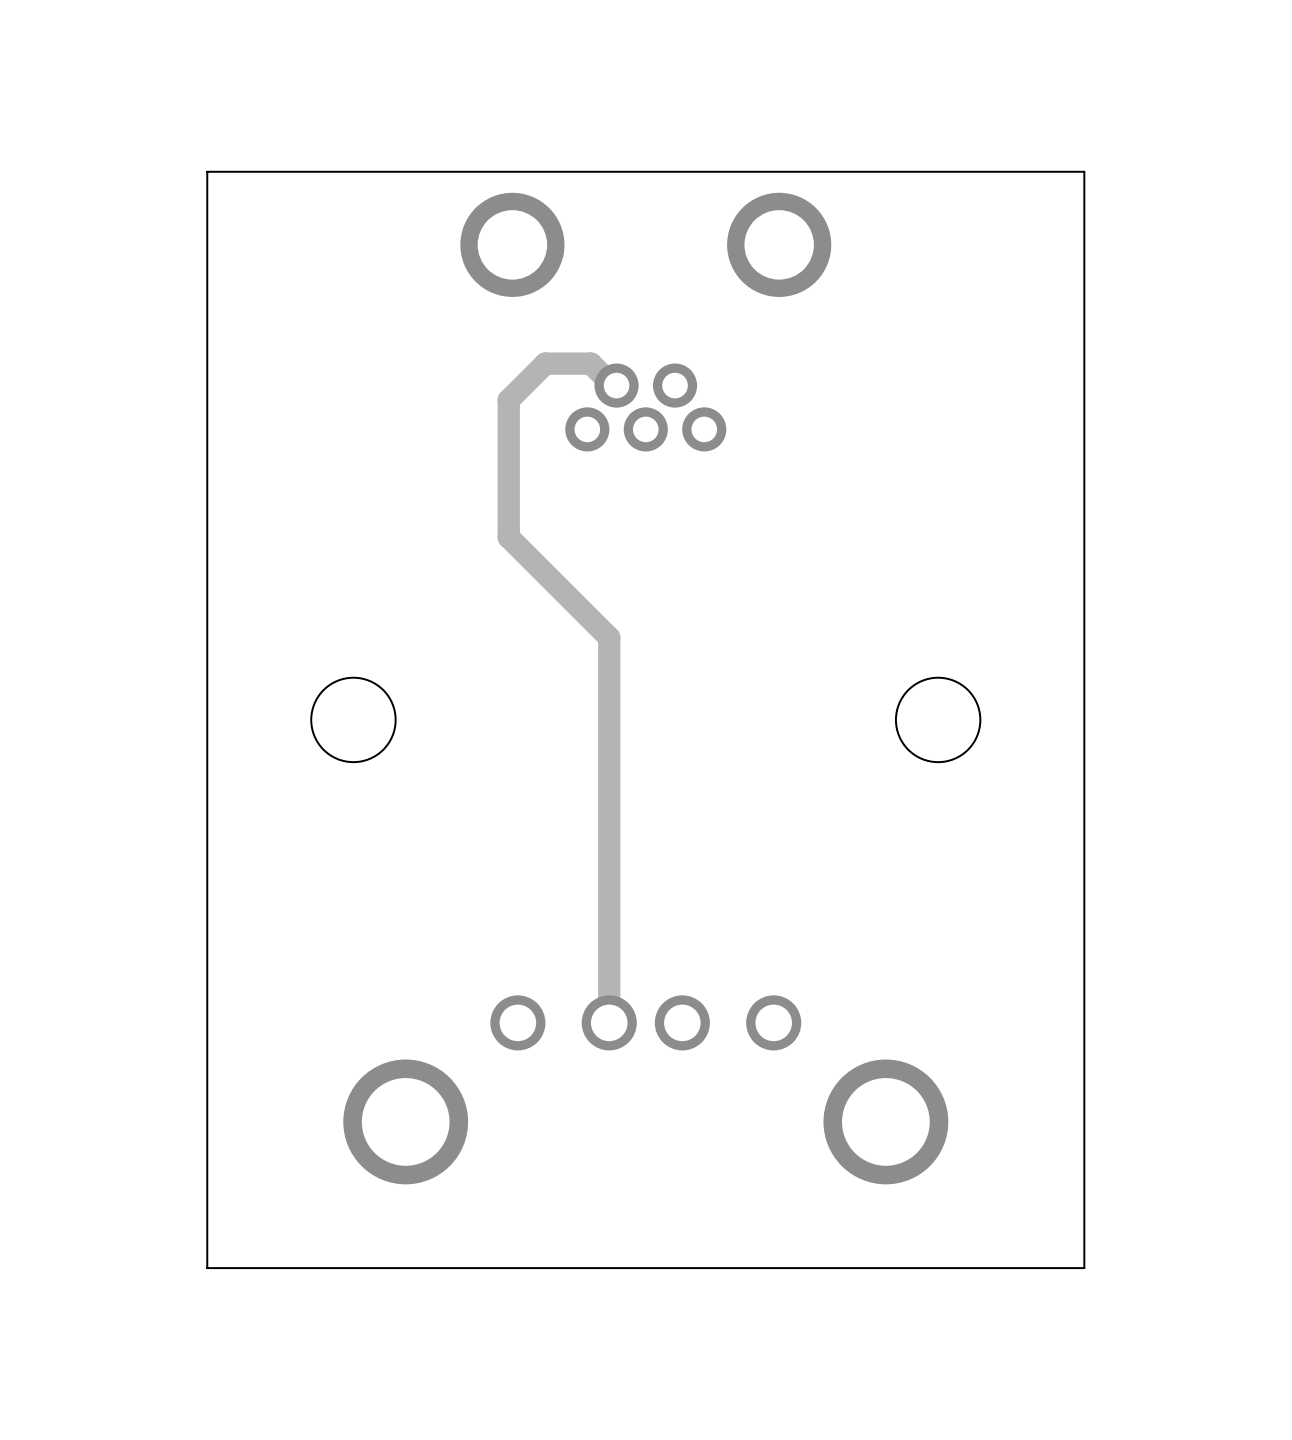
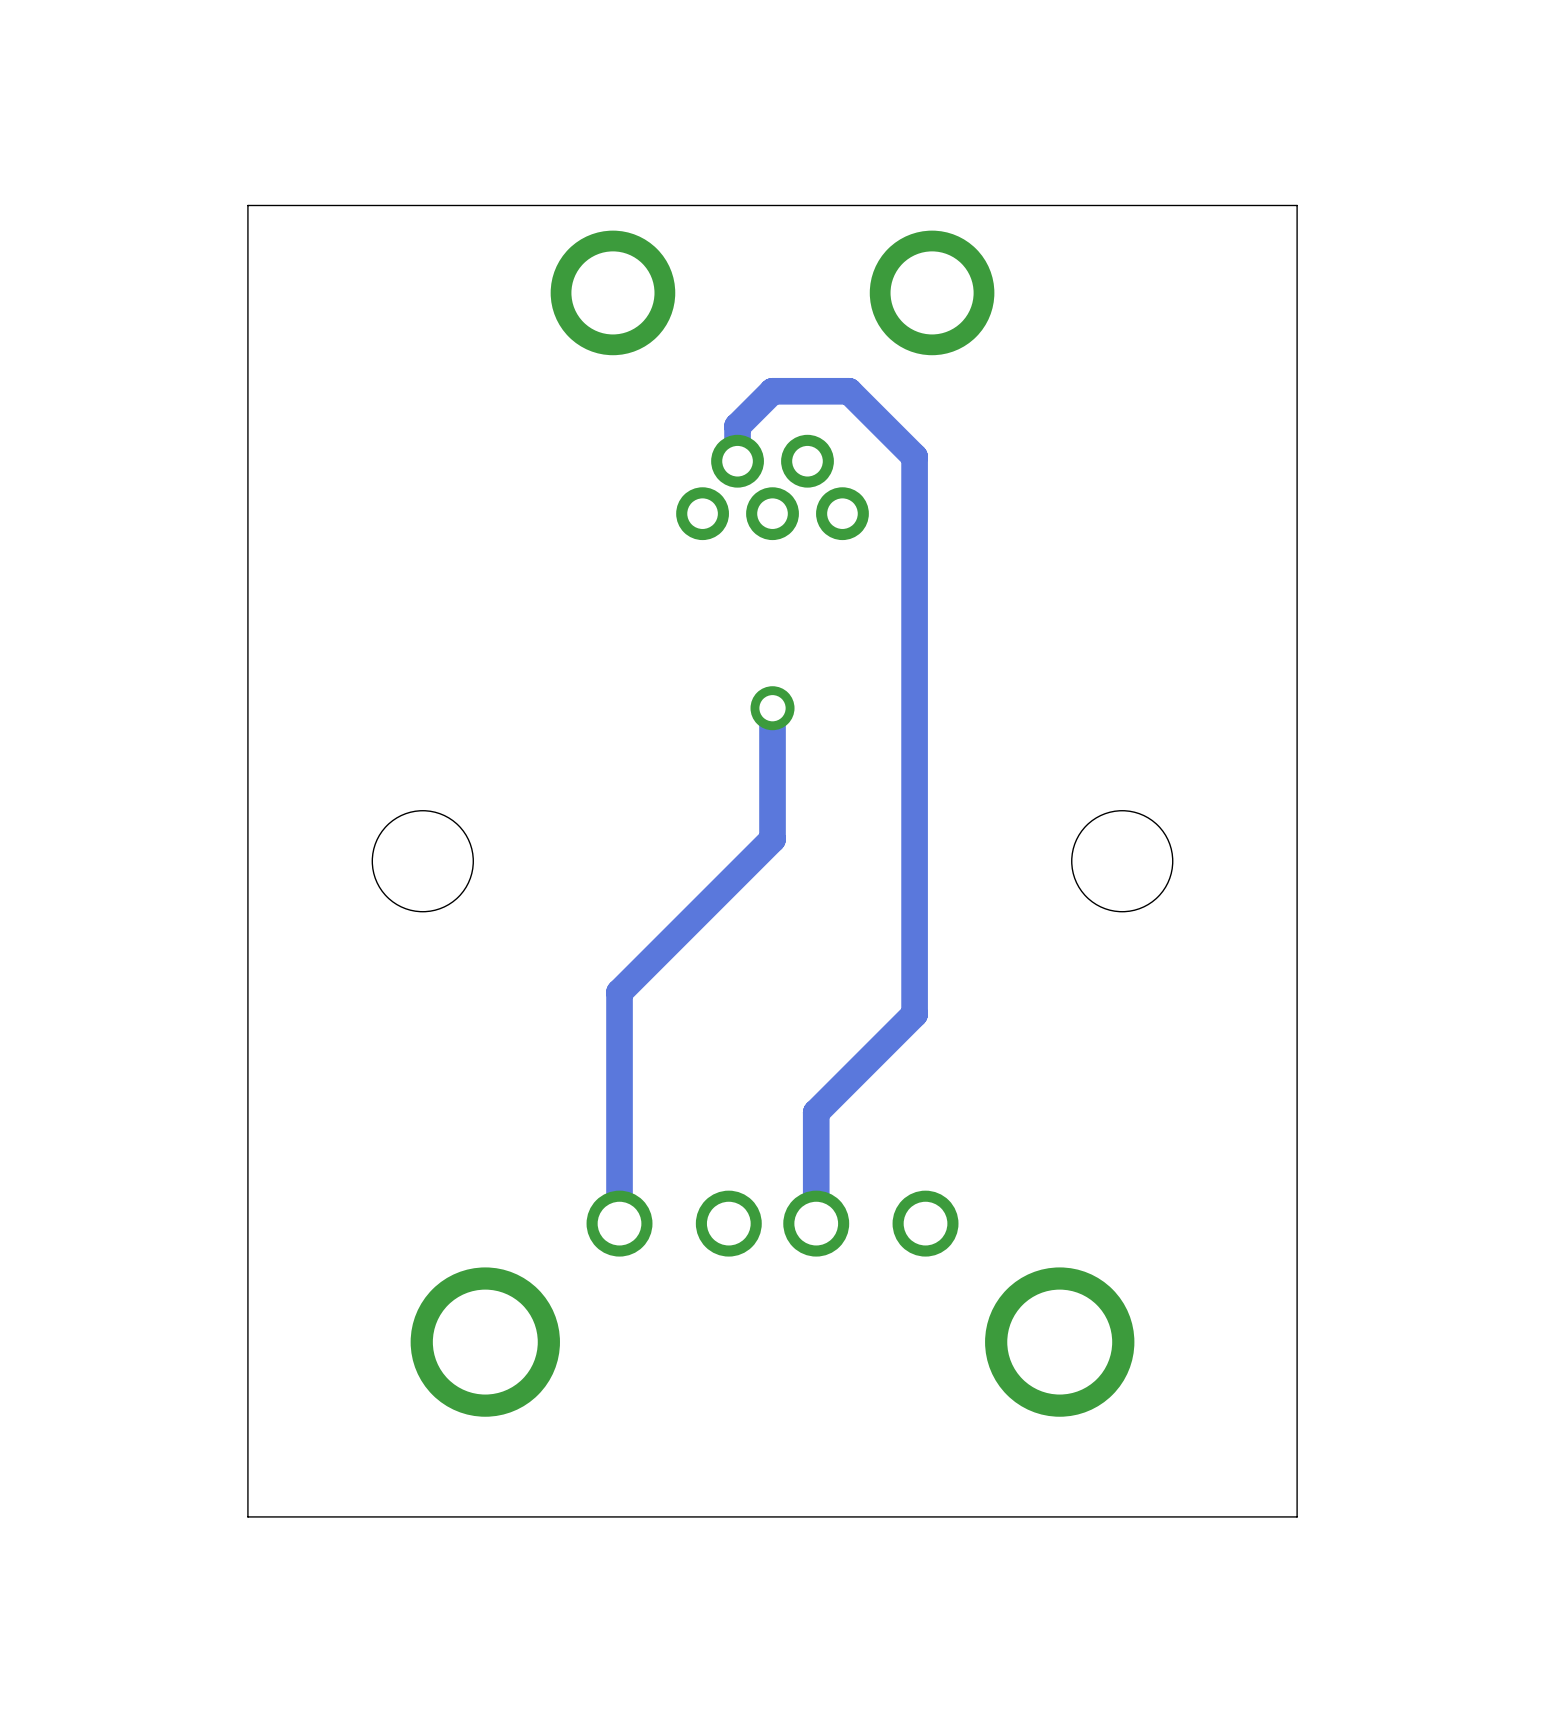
track: (616, 385) (612, 385) (590, 363) (545, 363) (508, 400) (508, 537) (609, 637) (609, 1022) -> (737, 461) (737, 426) (772, 391) (849, 391) (914, 456) (914, 1014) (816, 1112) (816, 1223)
track: none -> (772, 708) (772, 839) (619, 992) (619, 1223)
via: none -> (772, 708)

